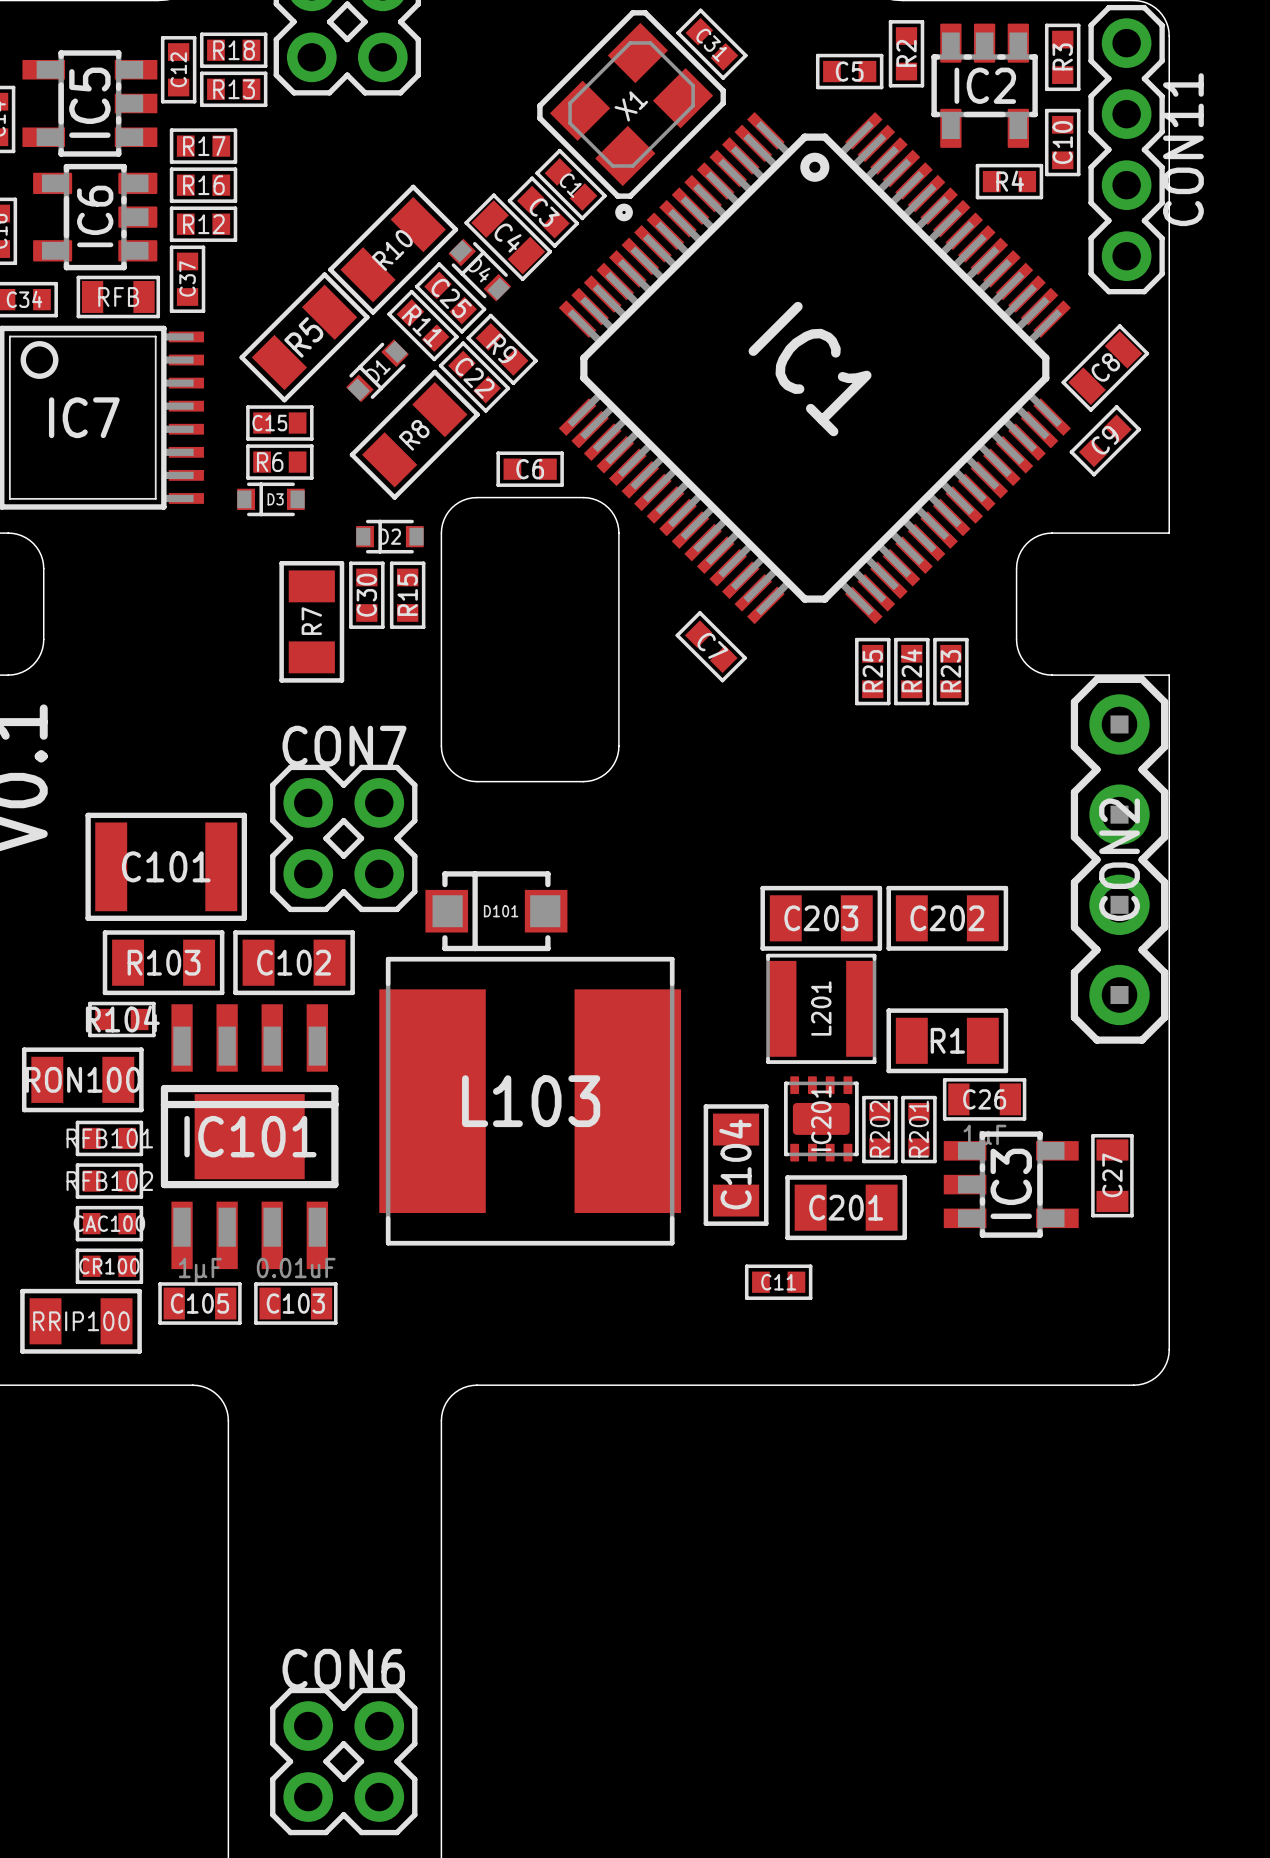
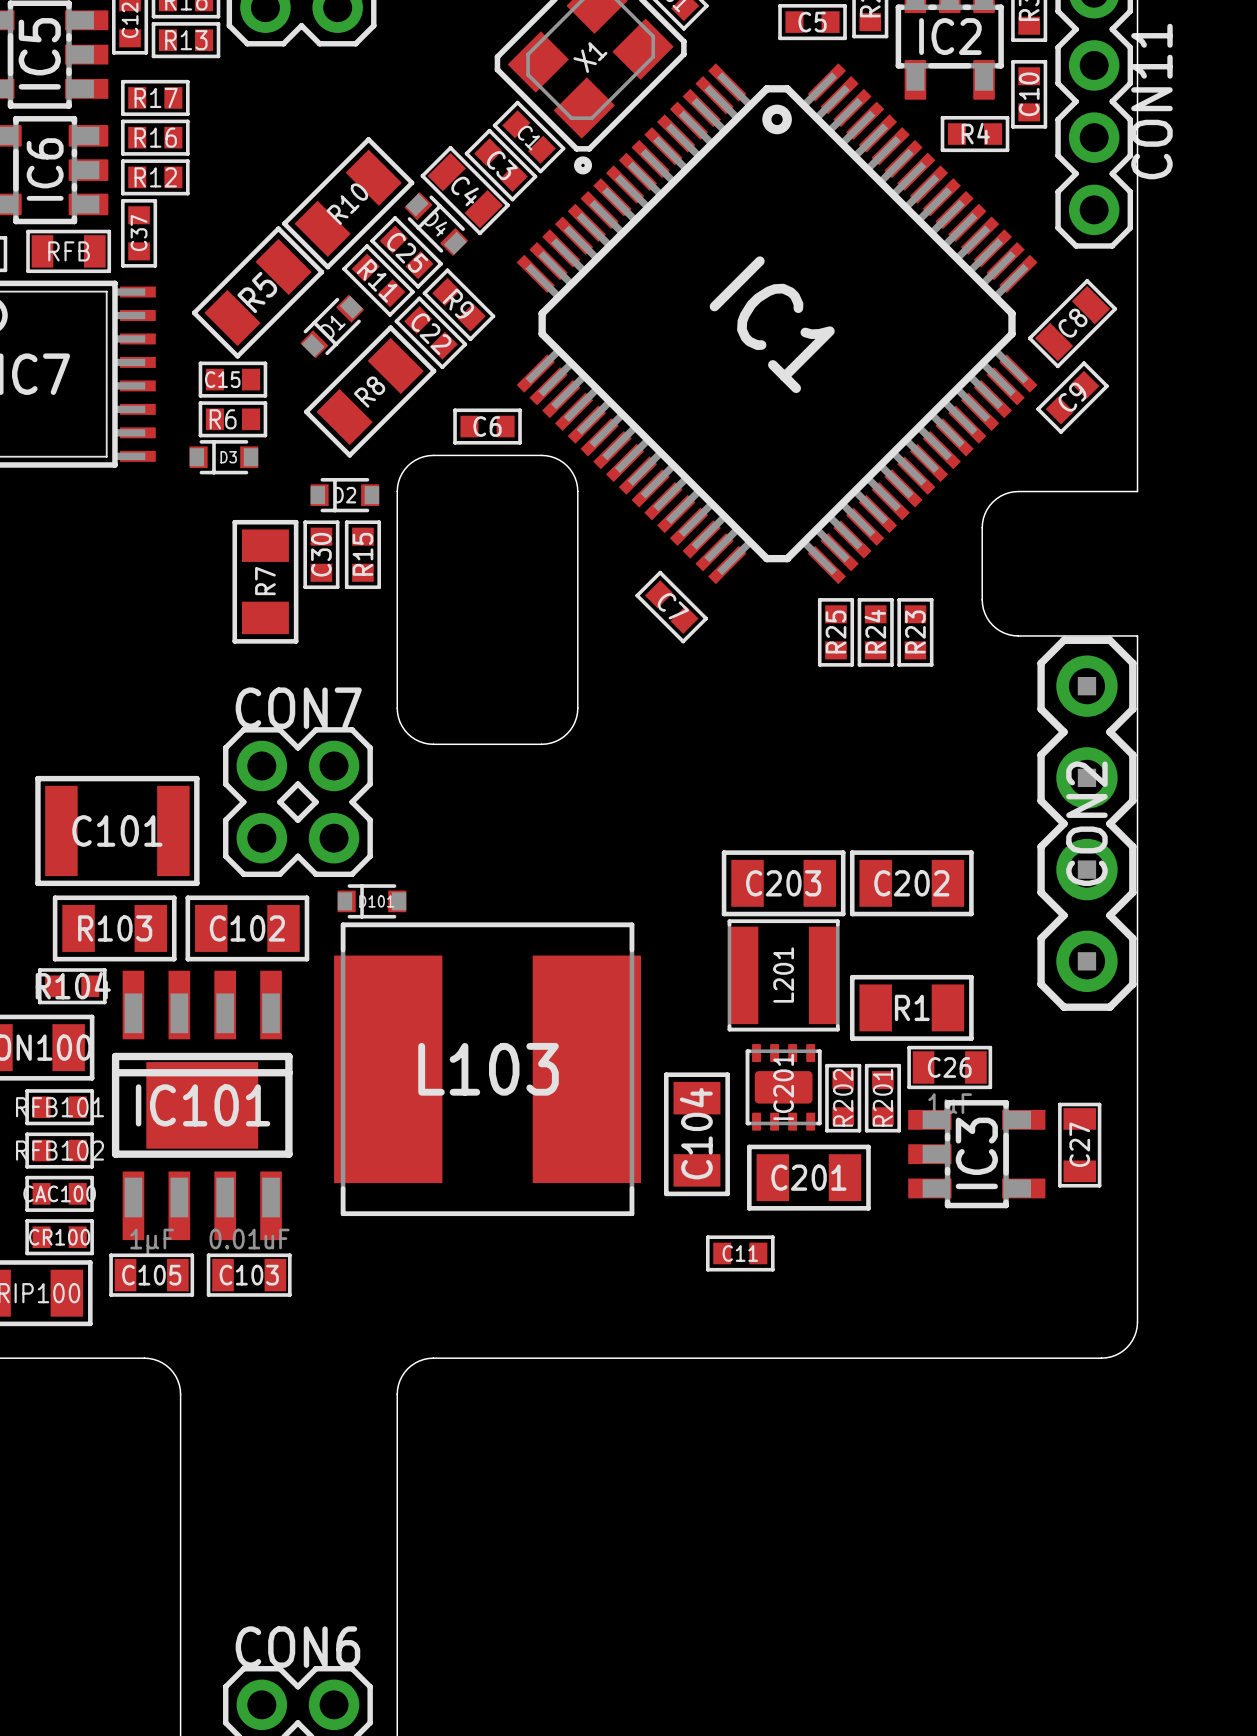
D101 footprint: [425, 871, 568, 952] -> [337, 884, 407, 919]

